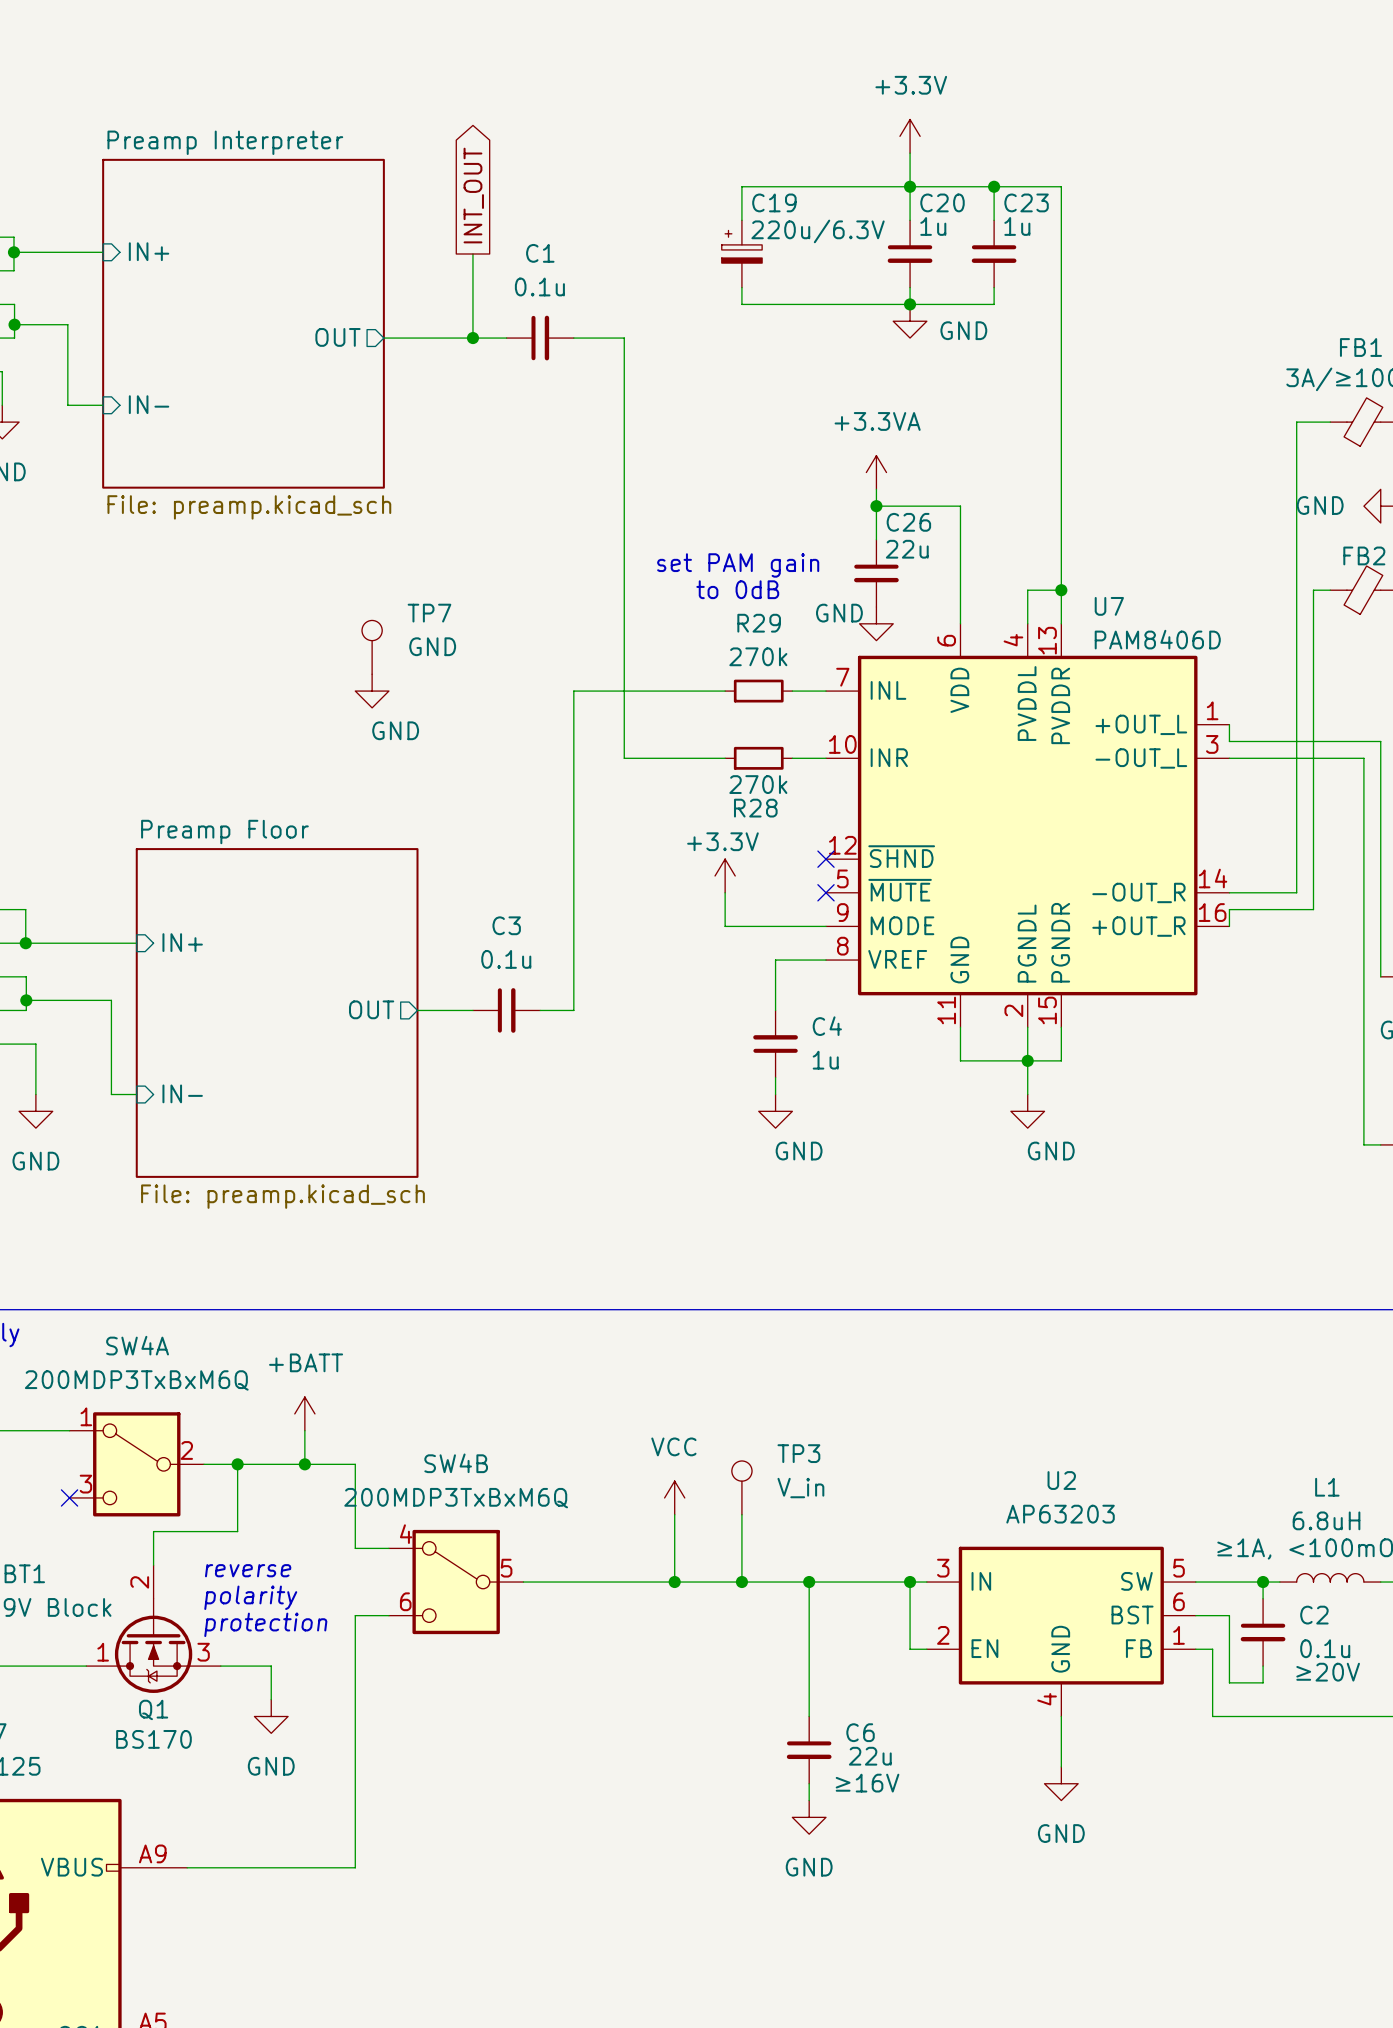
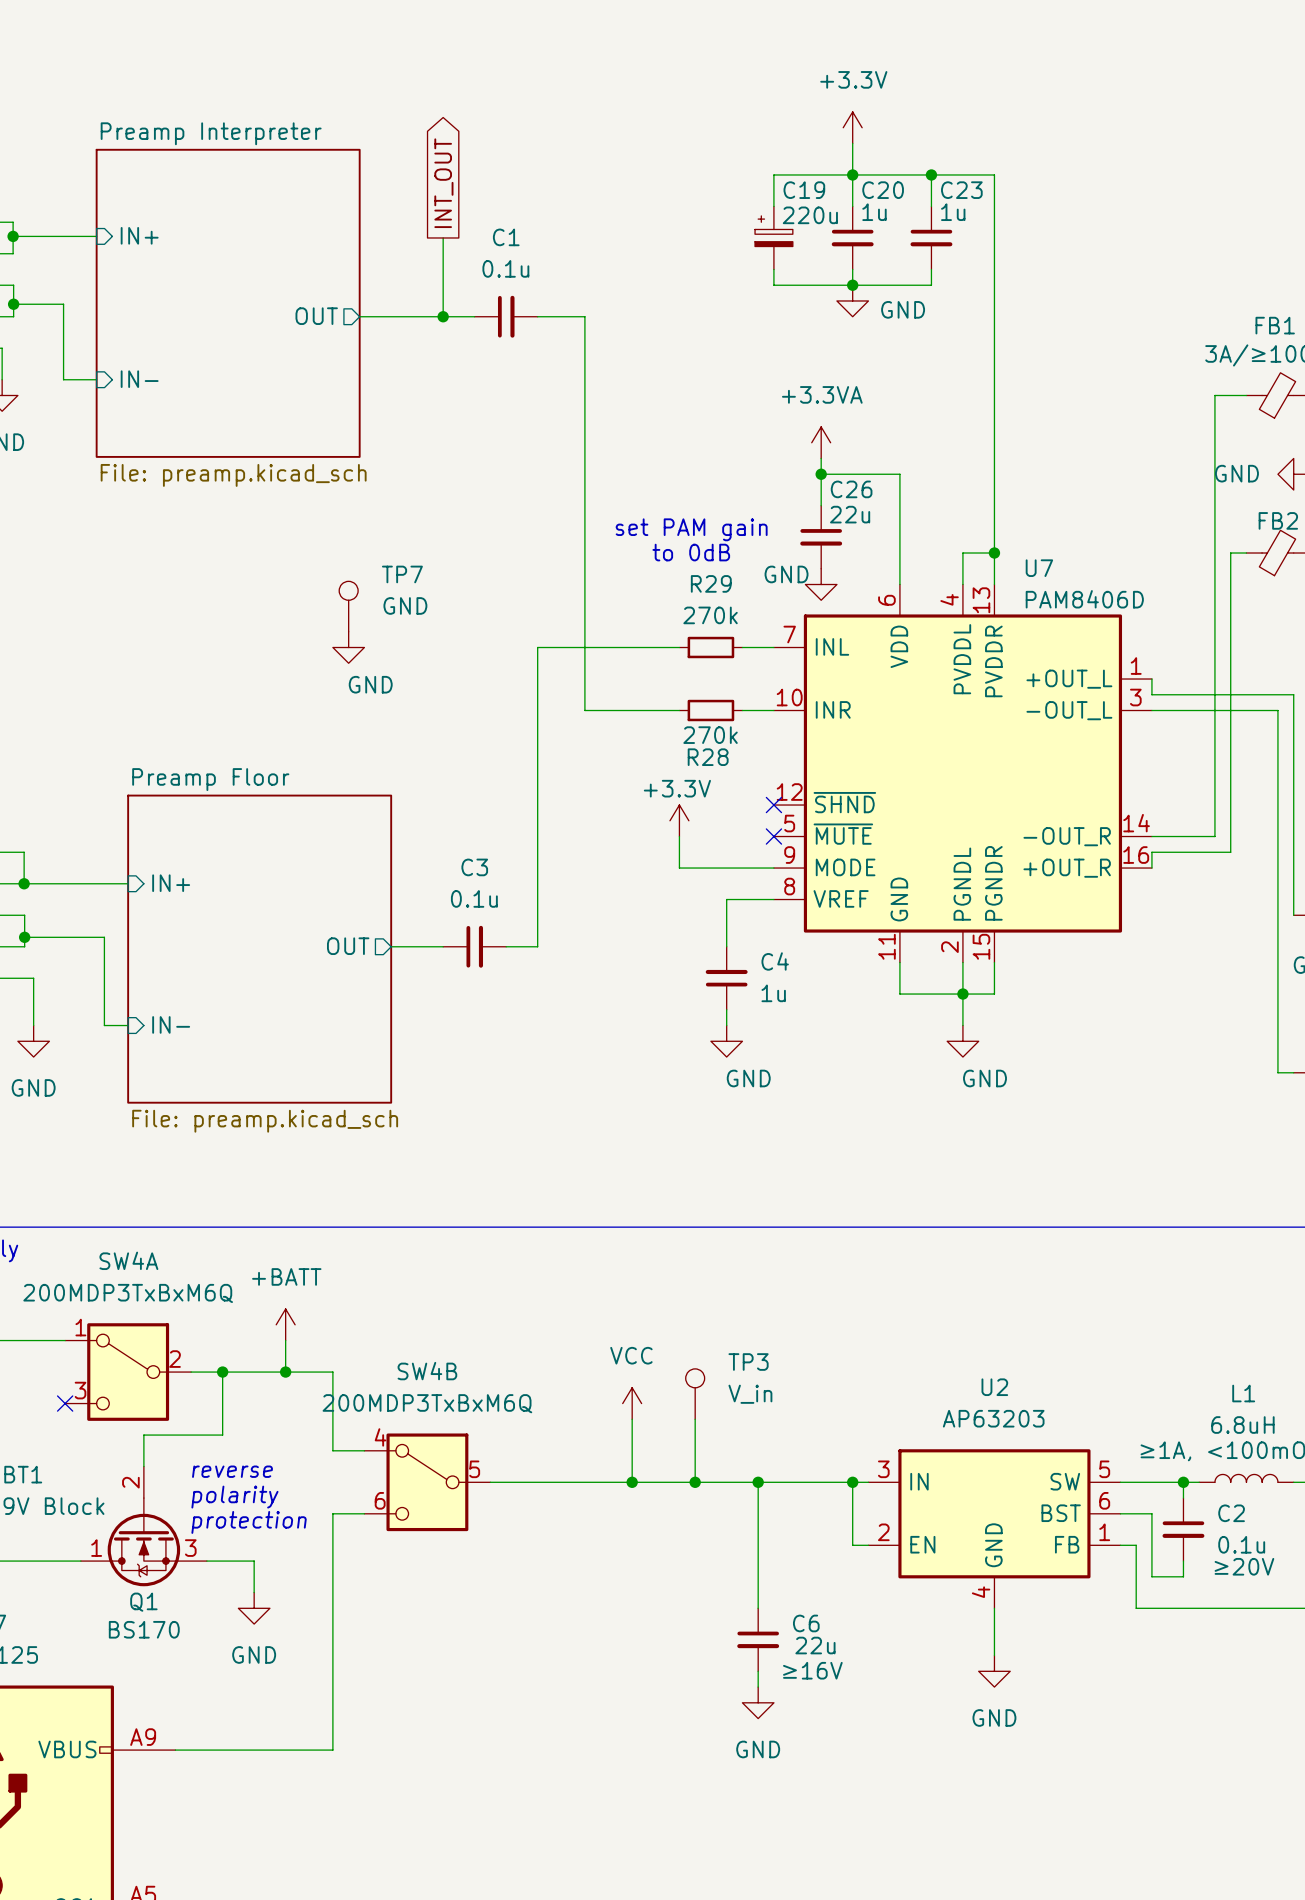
wire: (825, 186) (741, 186) (741, 220) -> (773, 174) (773, 206)
C19 value: 220u/6.3V (818, 231) -> 220u (810, 215)
C19 position: (741, 253) -> (773, 237)
wire: (741, 287) (741, 304) (825, 304) -> (773, 269) (773, 285)

